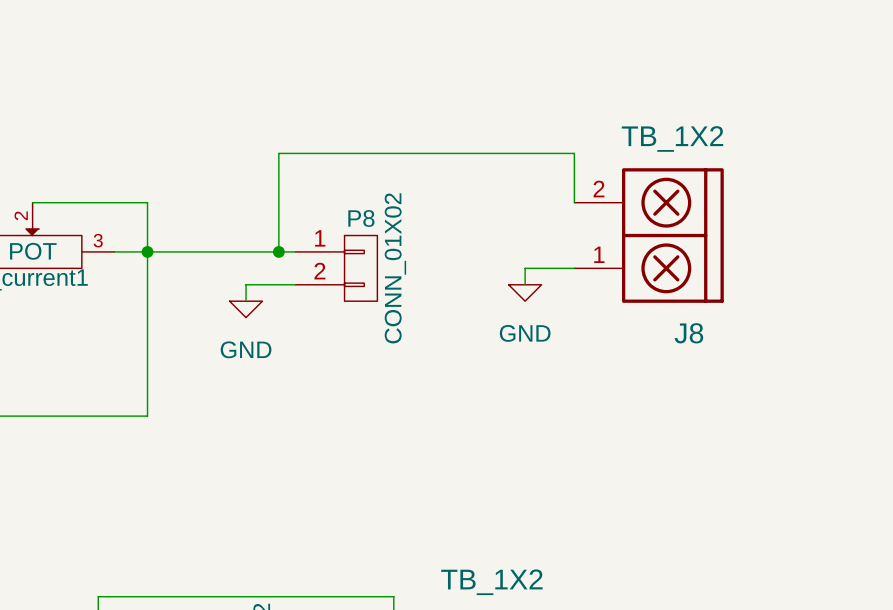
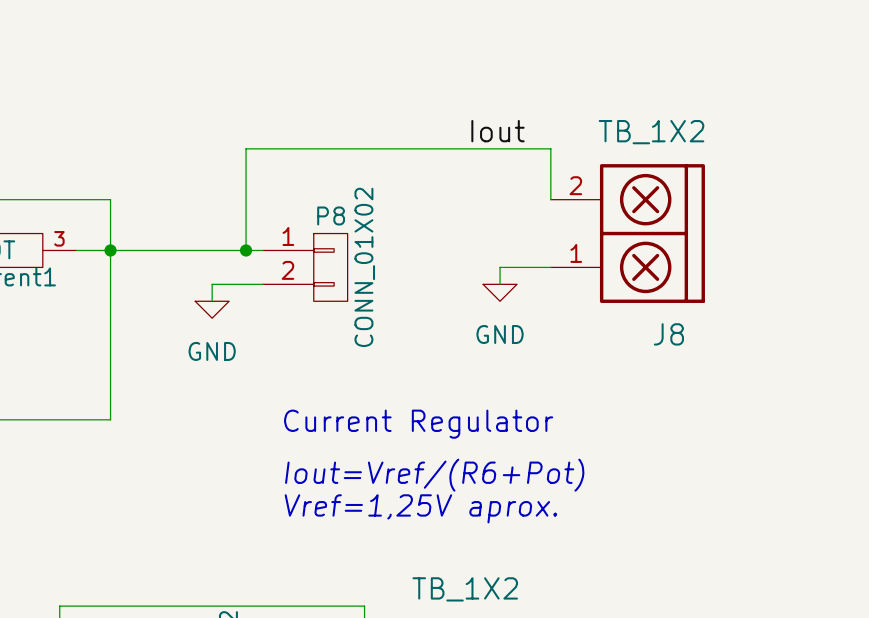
label: none -> Iout (498, 131)
text: none -> Current Regulator (418, 424)
text: none -> Iout=Vref/(R6+Pot) (434, 475)
text: none -> Vref=1,25V aprox. (420, 508)

